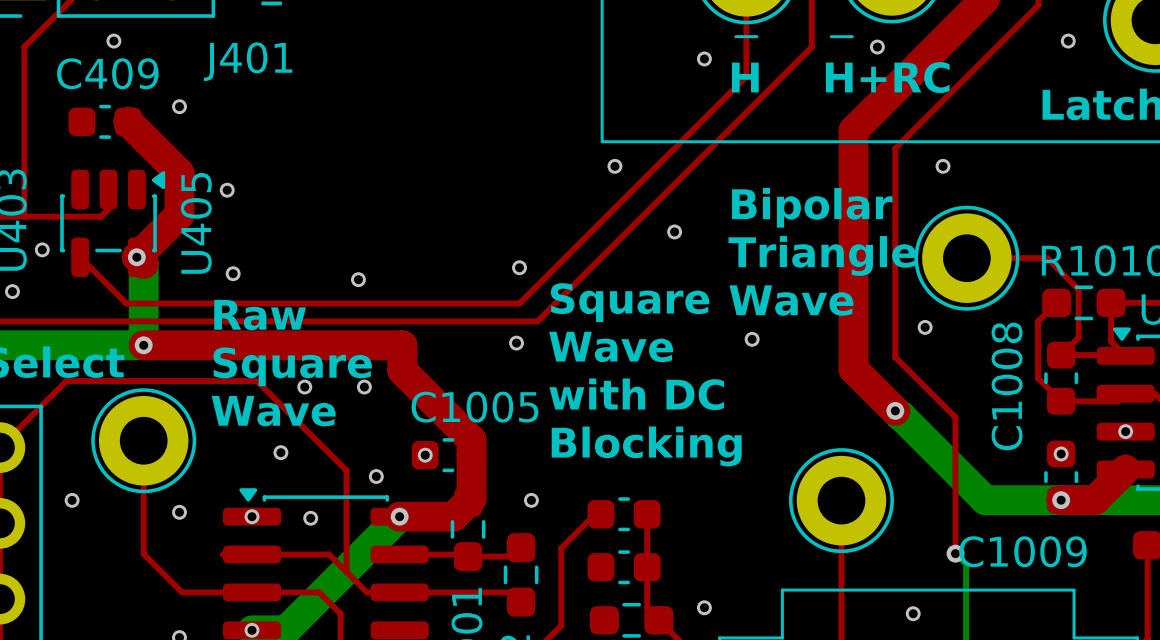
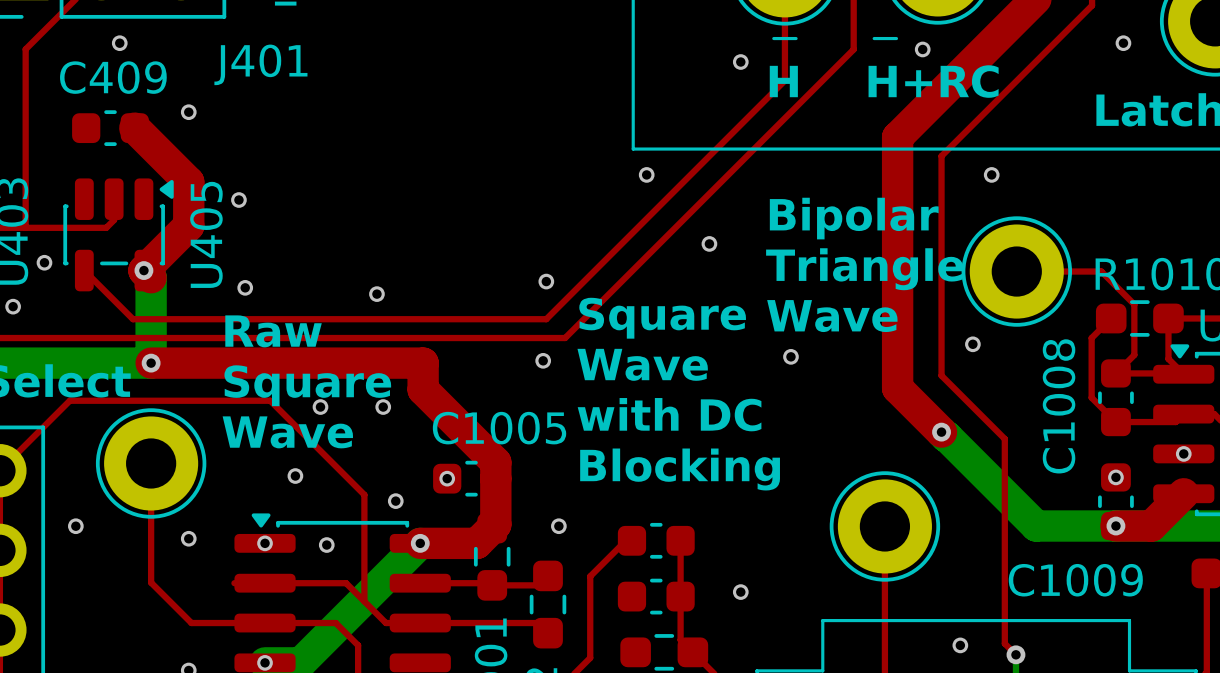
top track: none -> (1004, 582) (1004, 643) (1015, 654)
via position: (955, 553) -> (1015, 654)
bottom track: (951, 557) (955, 553) (966, 564) (966, 622) -> none
via position: (704, 607) -> (740, 592)

